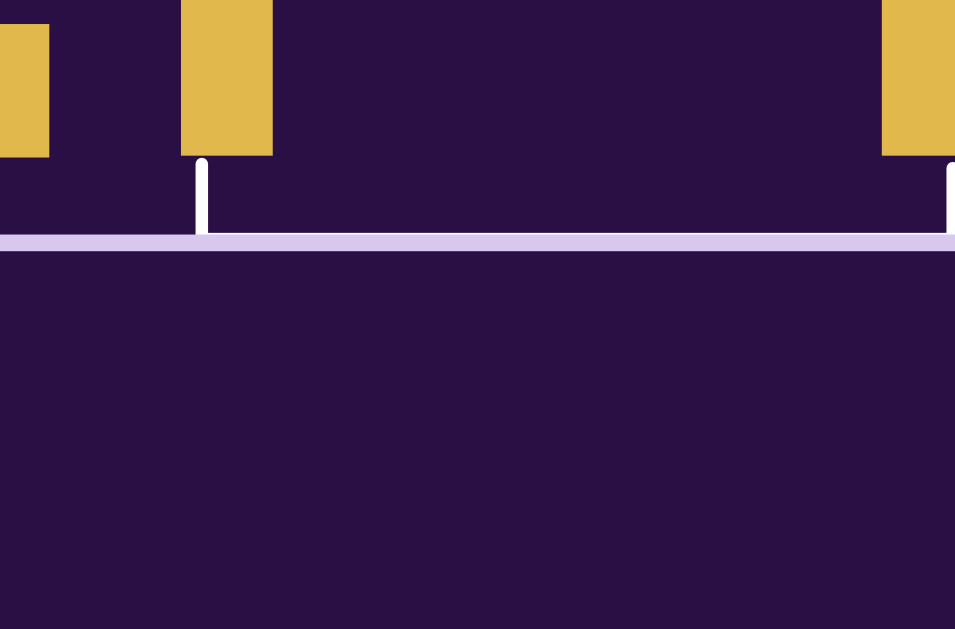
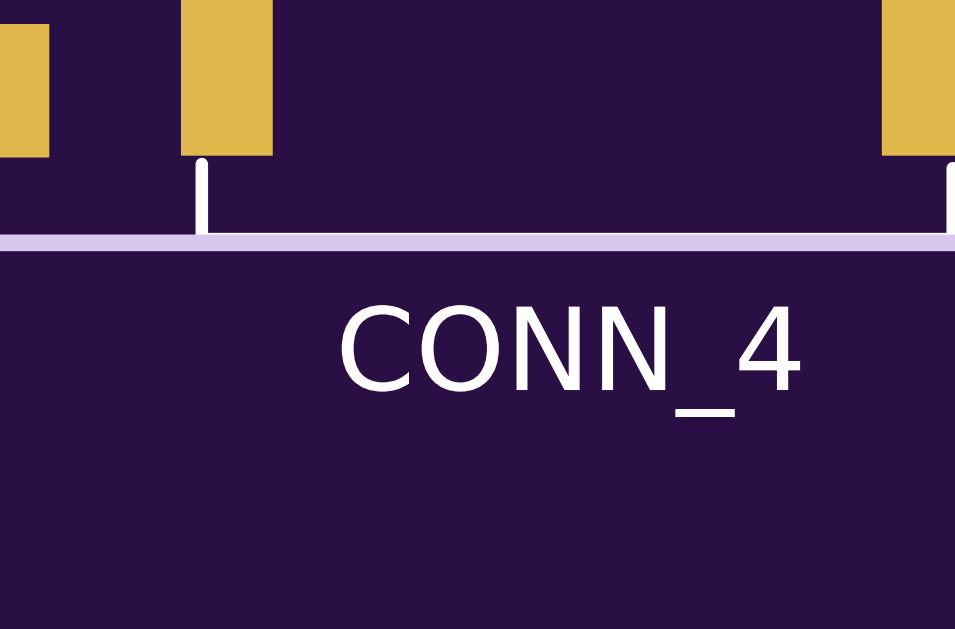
part value: none -> CONN_4 (570, 361)

